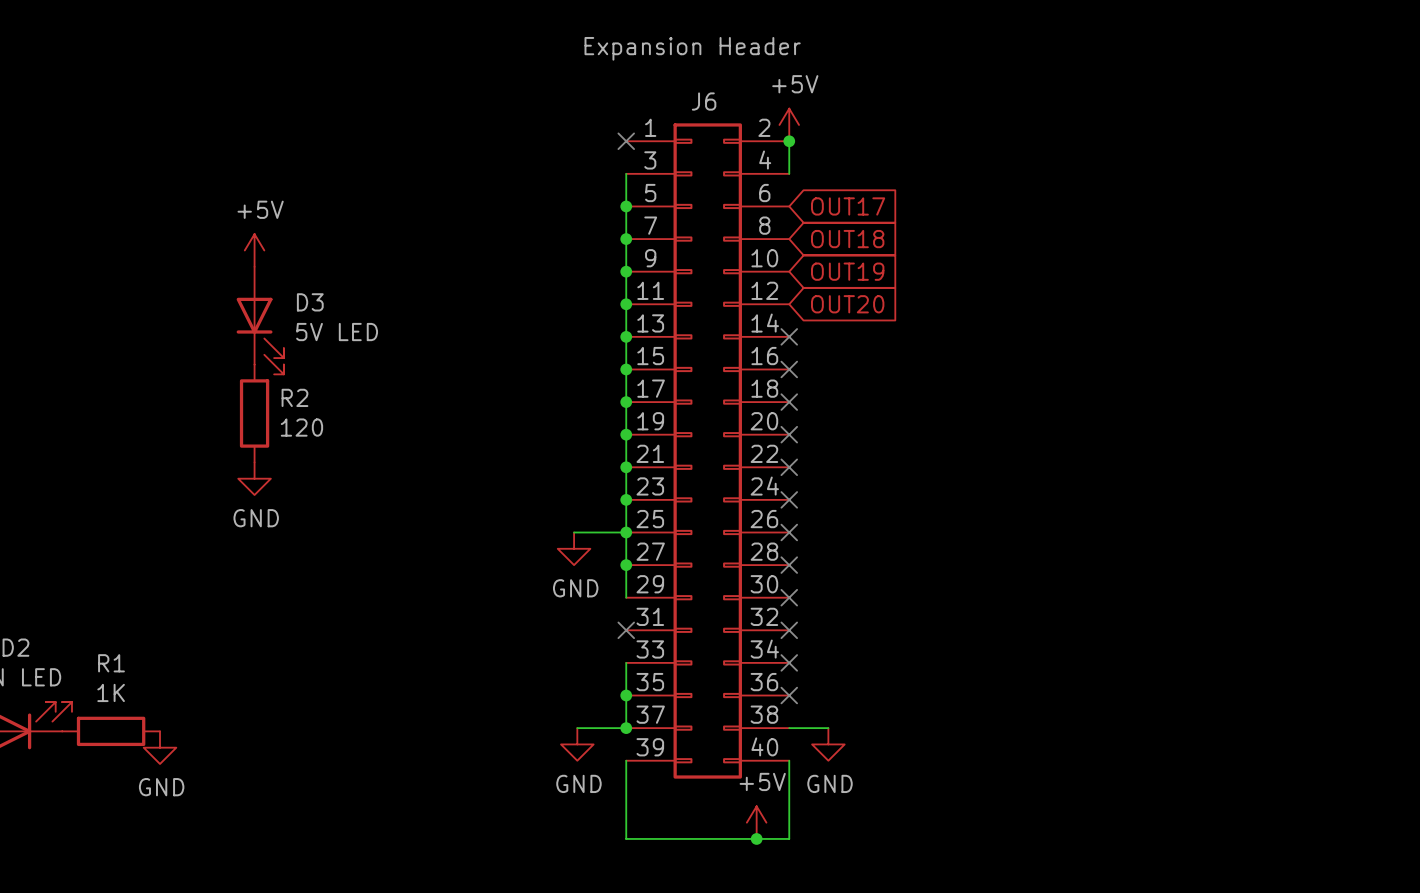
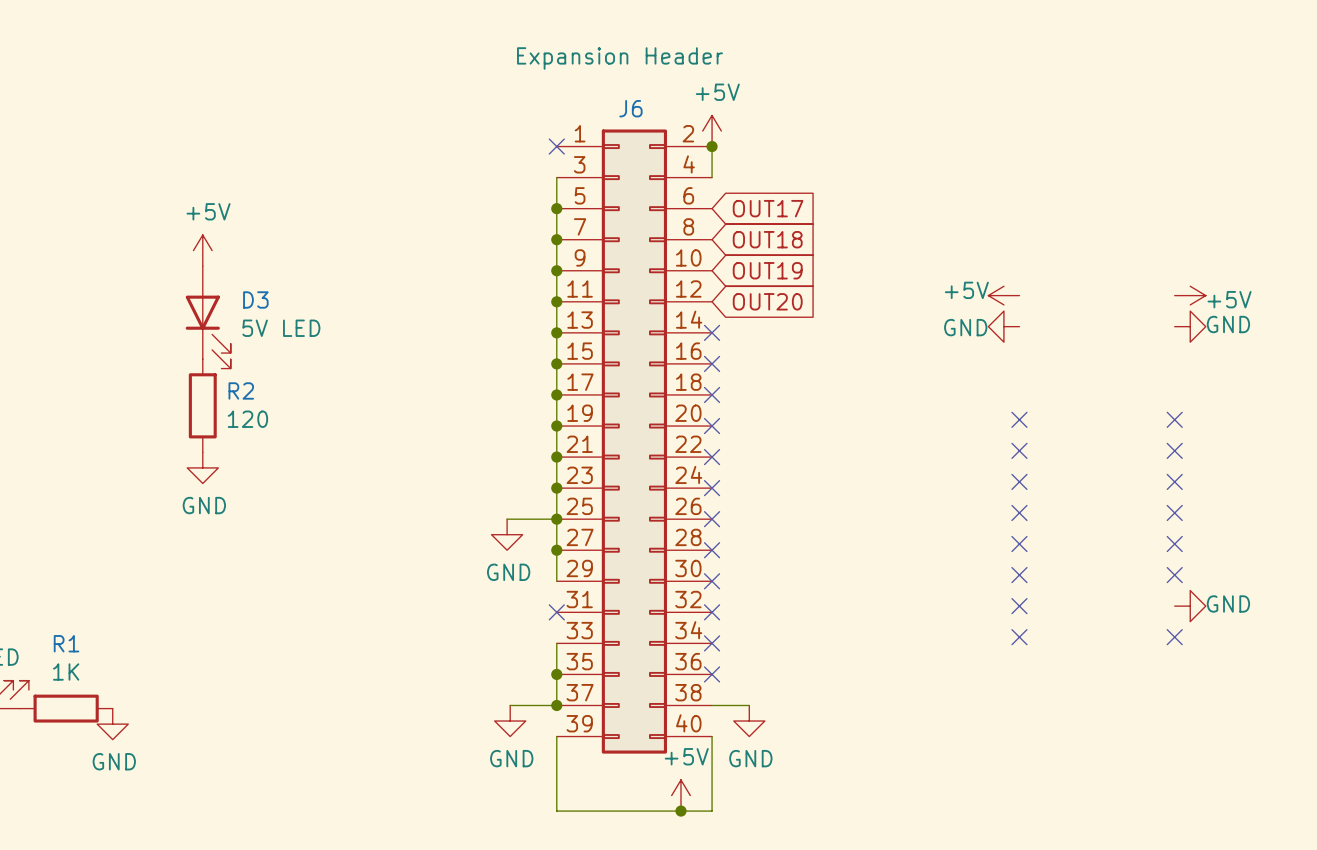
power symbol: none -> +5V (1003, 295)
power symbol: none -> +5V (1190, 295)
power symbol: none -> GND (1003, 326)
power symbol: none -> GND (1190, 326)
no-connect mark: none -> (1019, 419)
no-connect mark: none -> (1174, 419)
no-connect mark: none -> (1019, 450)
no-connect mark: none -> (1174, 450)
no-connect mark: none -> (1019, 481)
no-connect mark: none -> (1174, 481)
no-connect mark: none -> (1019, 512)
no-connect mark: none -> (1174, 512)
no-connect mark: none -> (1019, 544)
no-connect mark: none -> (1174, 544)
no-connect mark: none -> (1019, 575)
no-connect mark: none -> (1174, 575)
no-connect mark: none -> (1019, 606)
power symbol: none -> GND (1190, 606)
no-connect mark: none -> (1019, 637)
no-connect mark: none -> (1174, 637)

